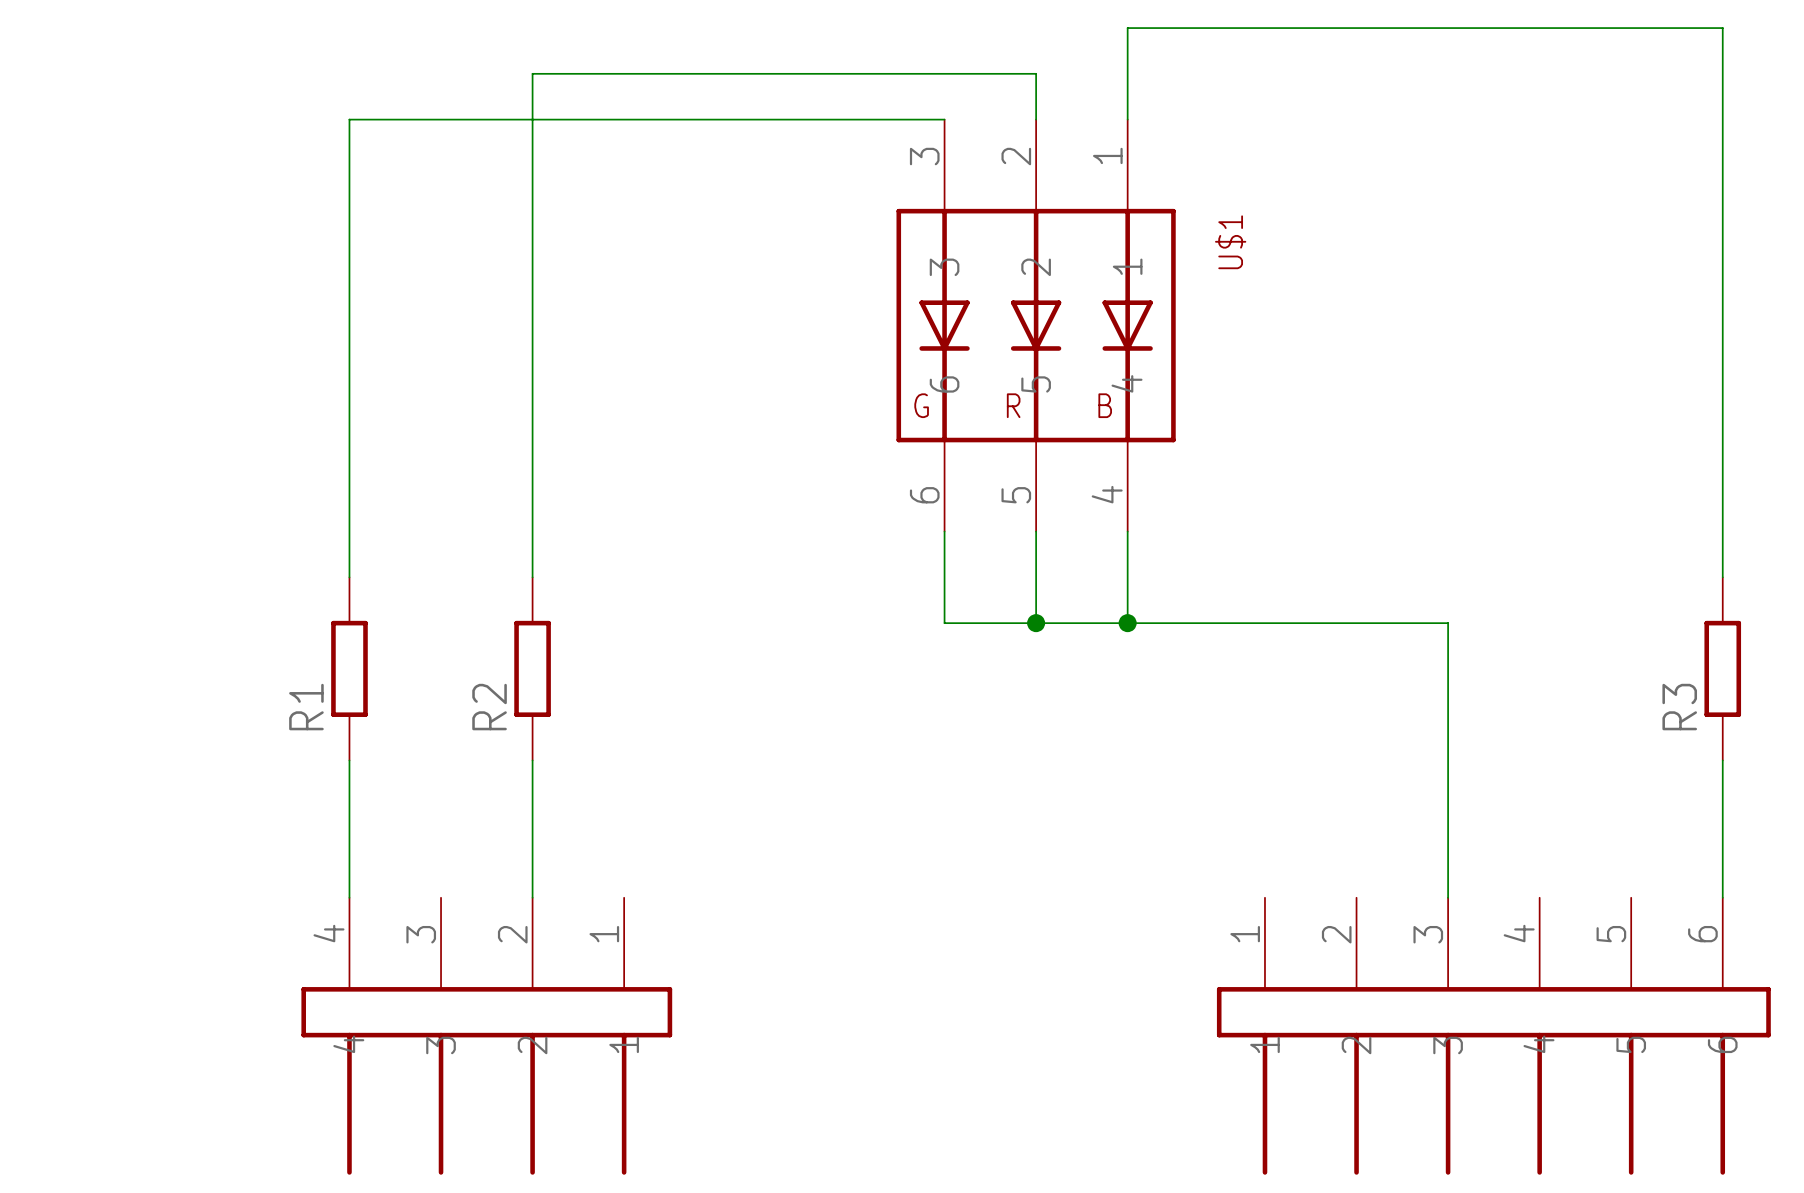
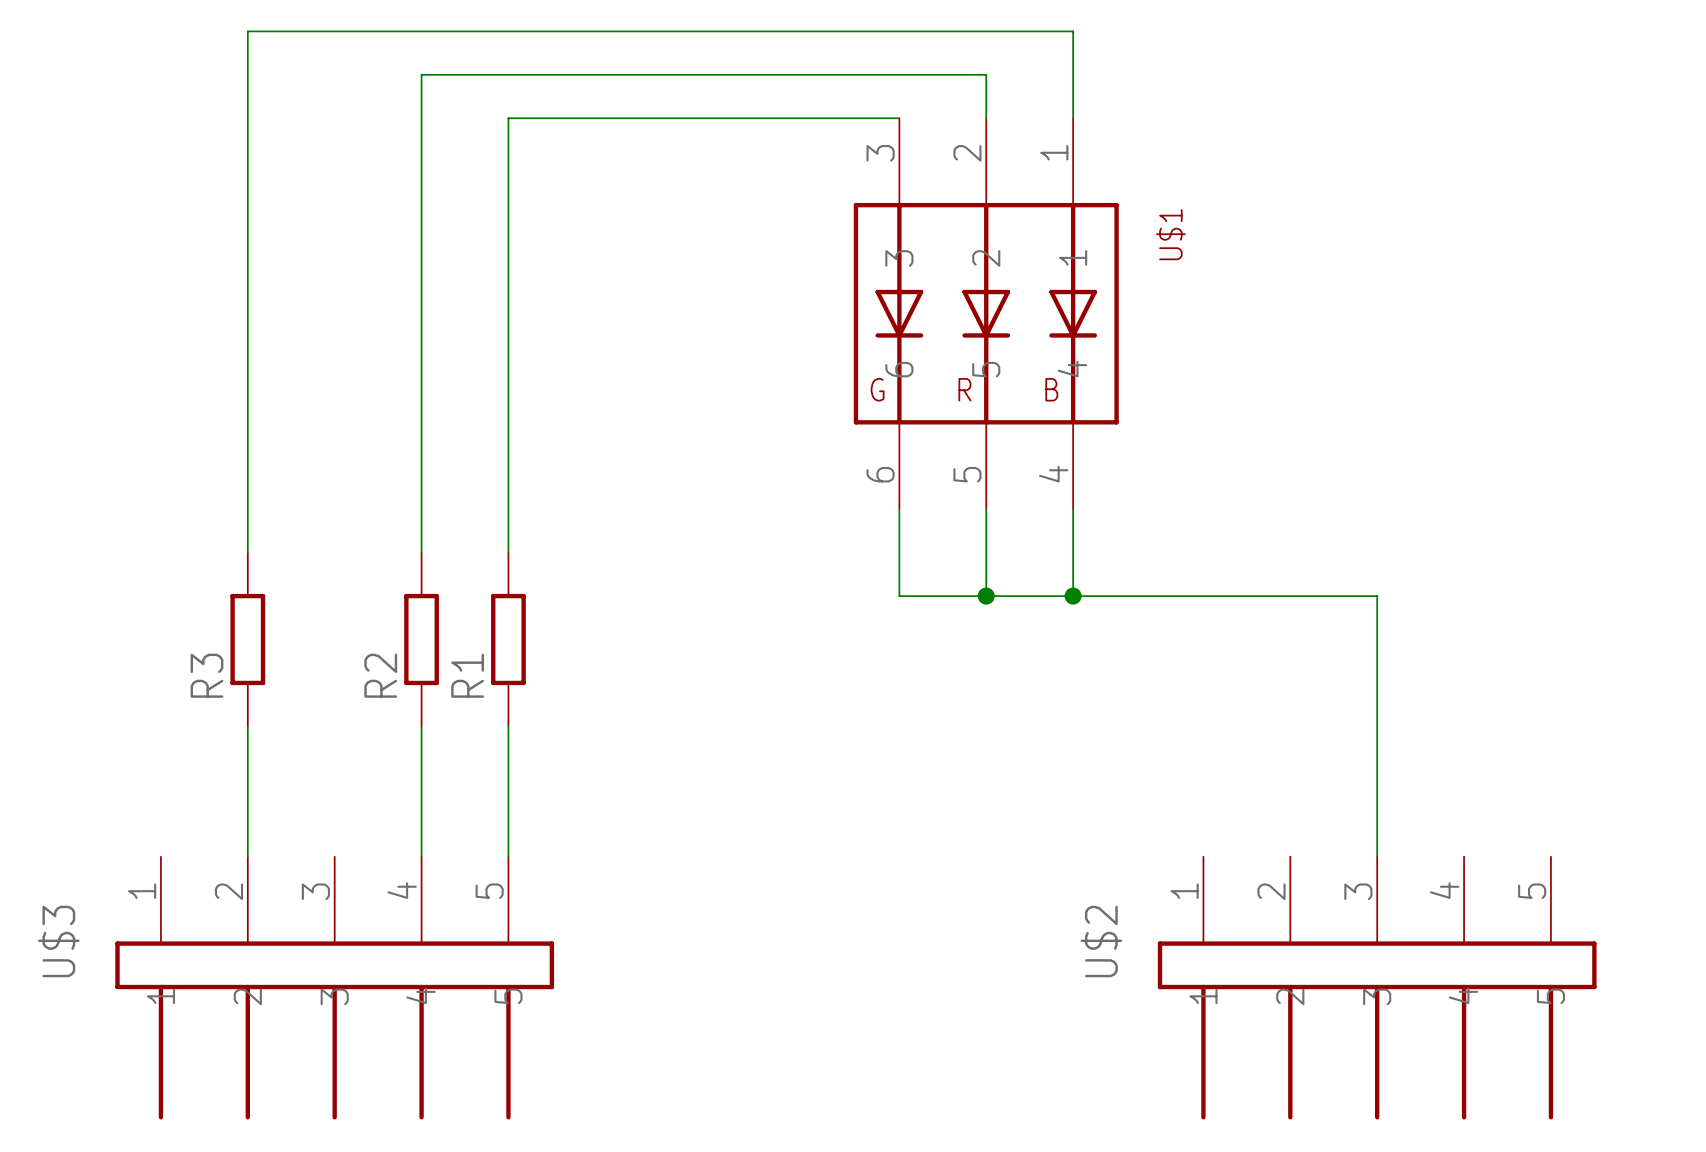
wire: (1127, 28) (1722, 28) (1722, 577) -> (1073, 31) (247, 31) (247, 552)
wire: (532, 73) (532, 119) (349, 119) (349, 577) -> (508, 74) (421, 74) (421, 552)
R1: (349, 668) -> none
R2: none -> (421, 639)
R3 position: (1722, 668) -> (247, 639)
R2 name: R2 (489, 707) -> R1 (467, 675)
wire: (349, 760) (349, 897) -> (247, 726) (247, 856)
wire: none -> (421, 726) (421, 856)
wire: (1722, 760) (1722, 897) -> none
U$3: none -> (334, 988)
part: (486, 1036) -> none
U$2: none -> (1377, 988)
part: (1493, 1036) -> none

